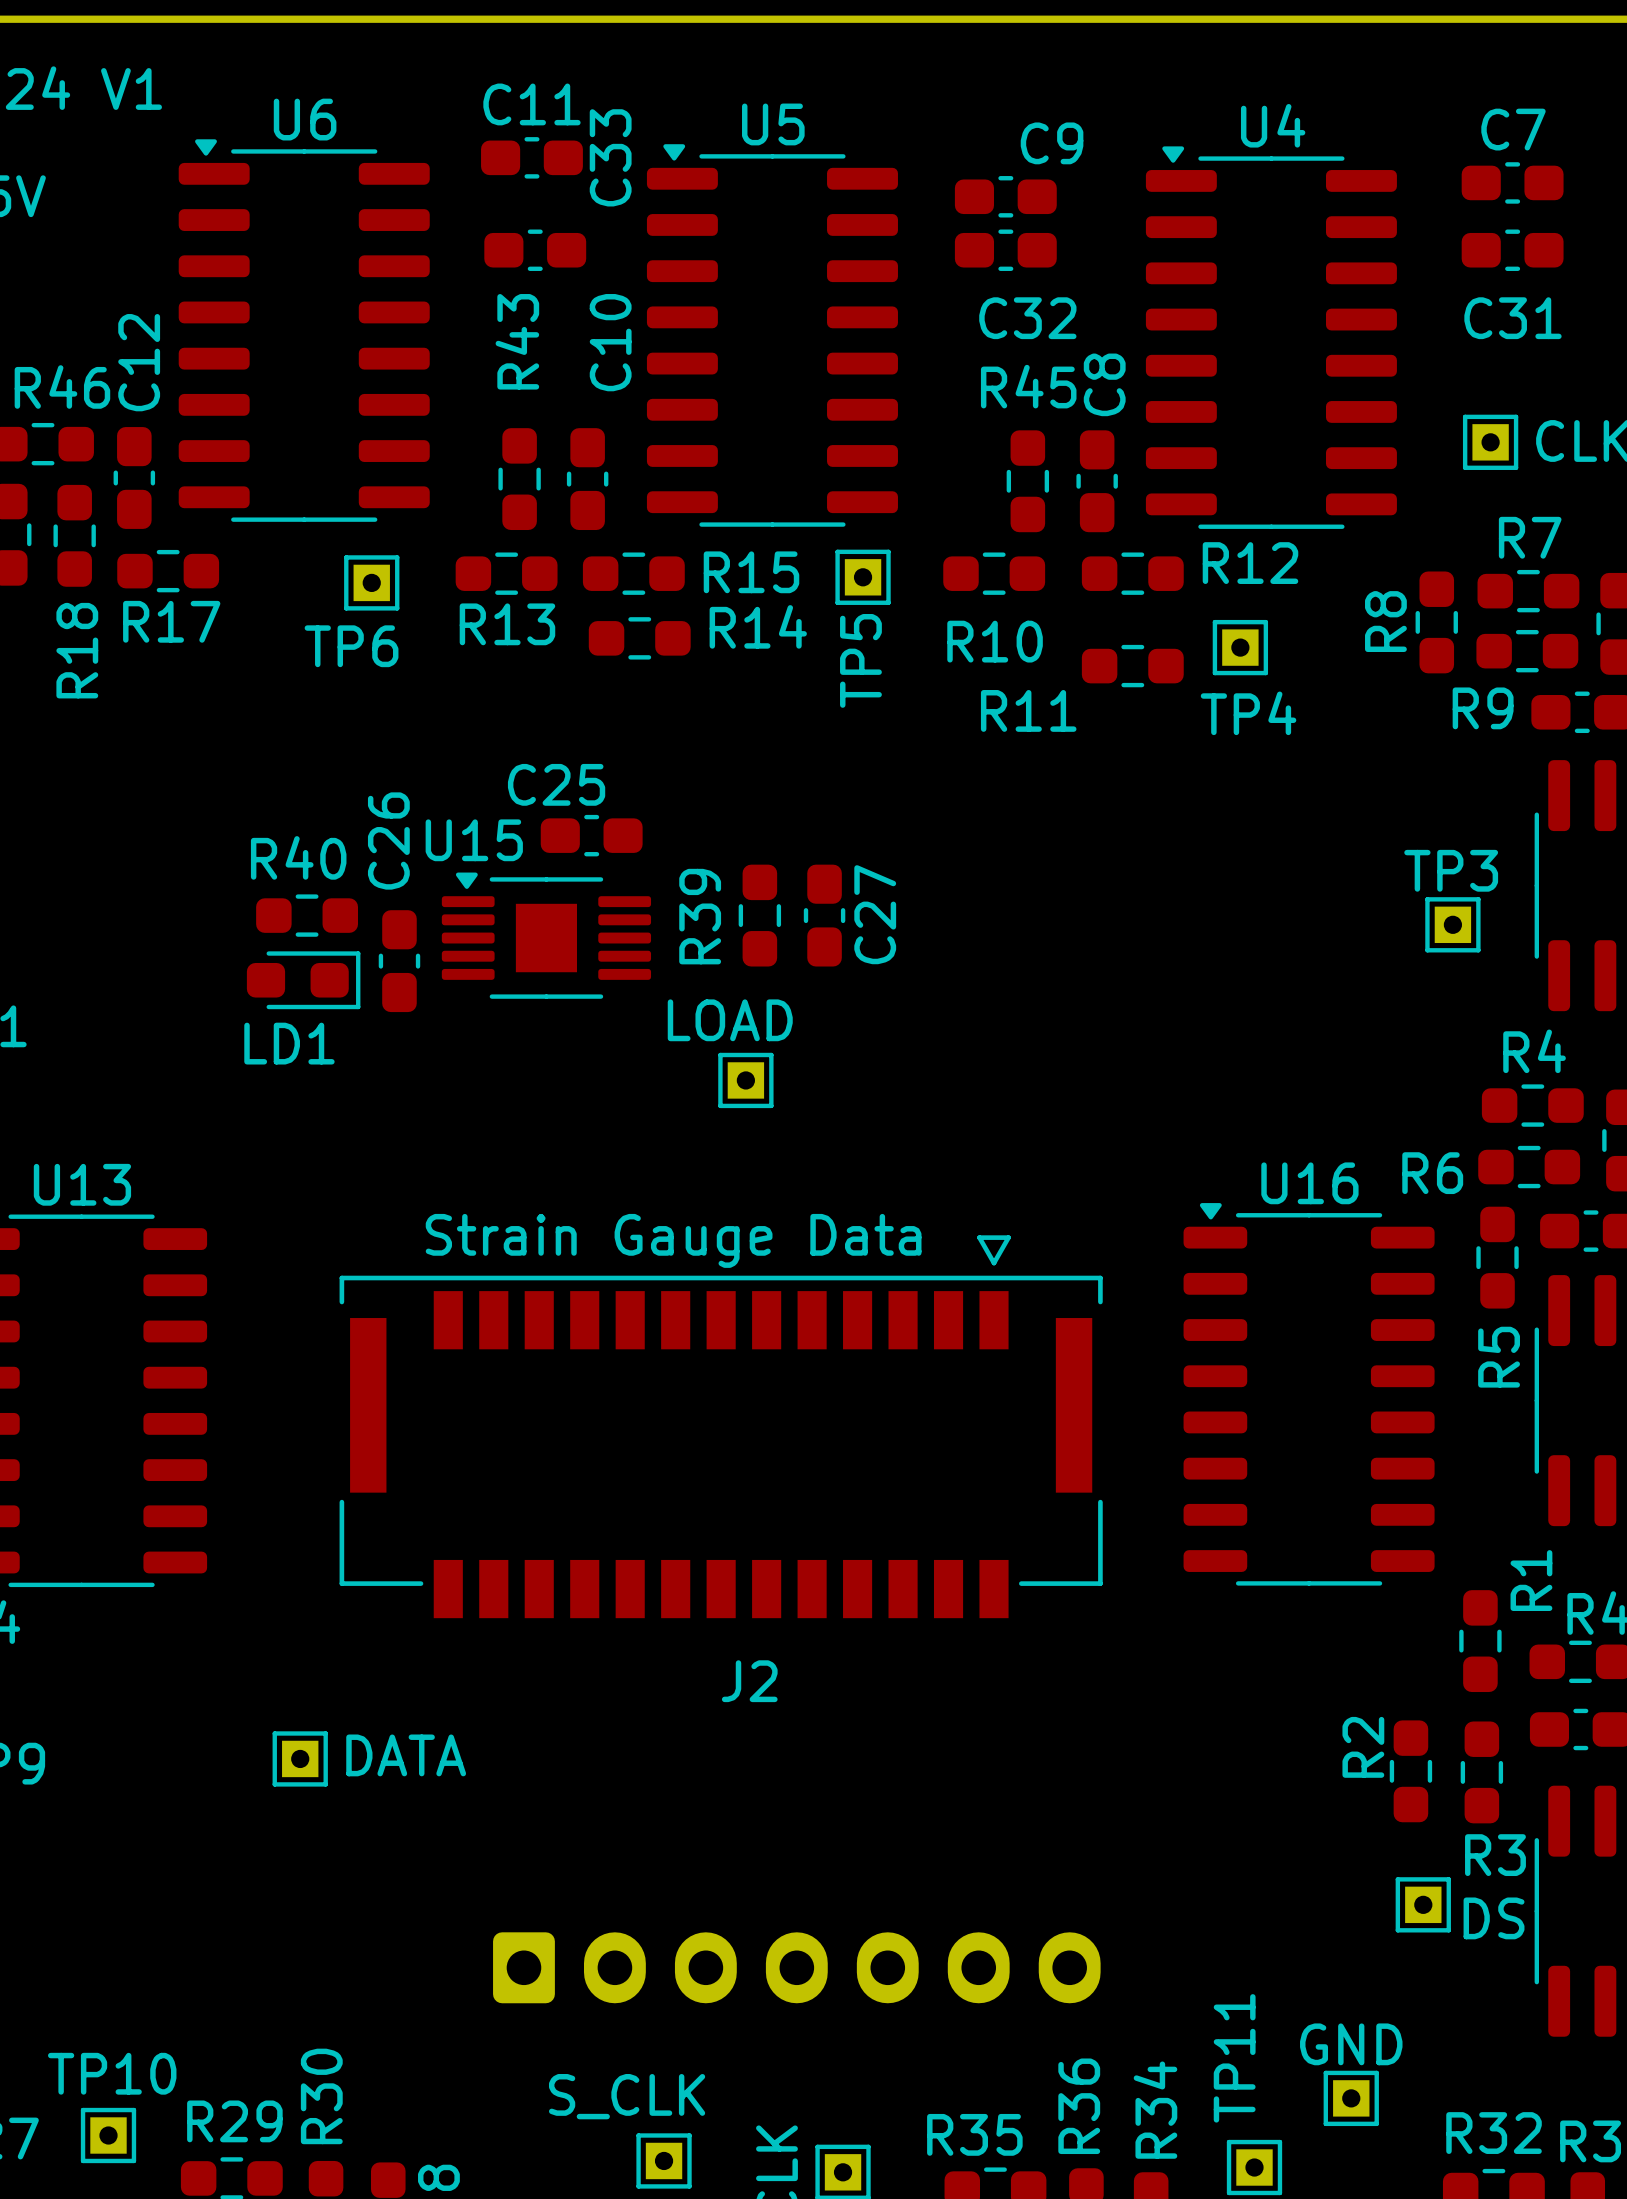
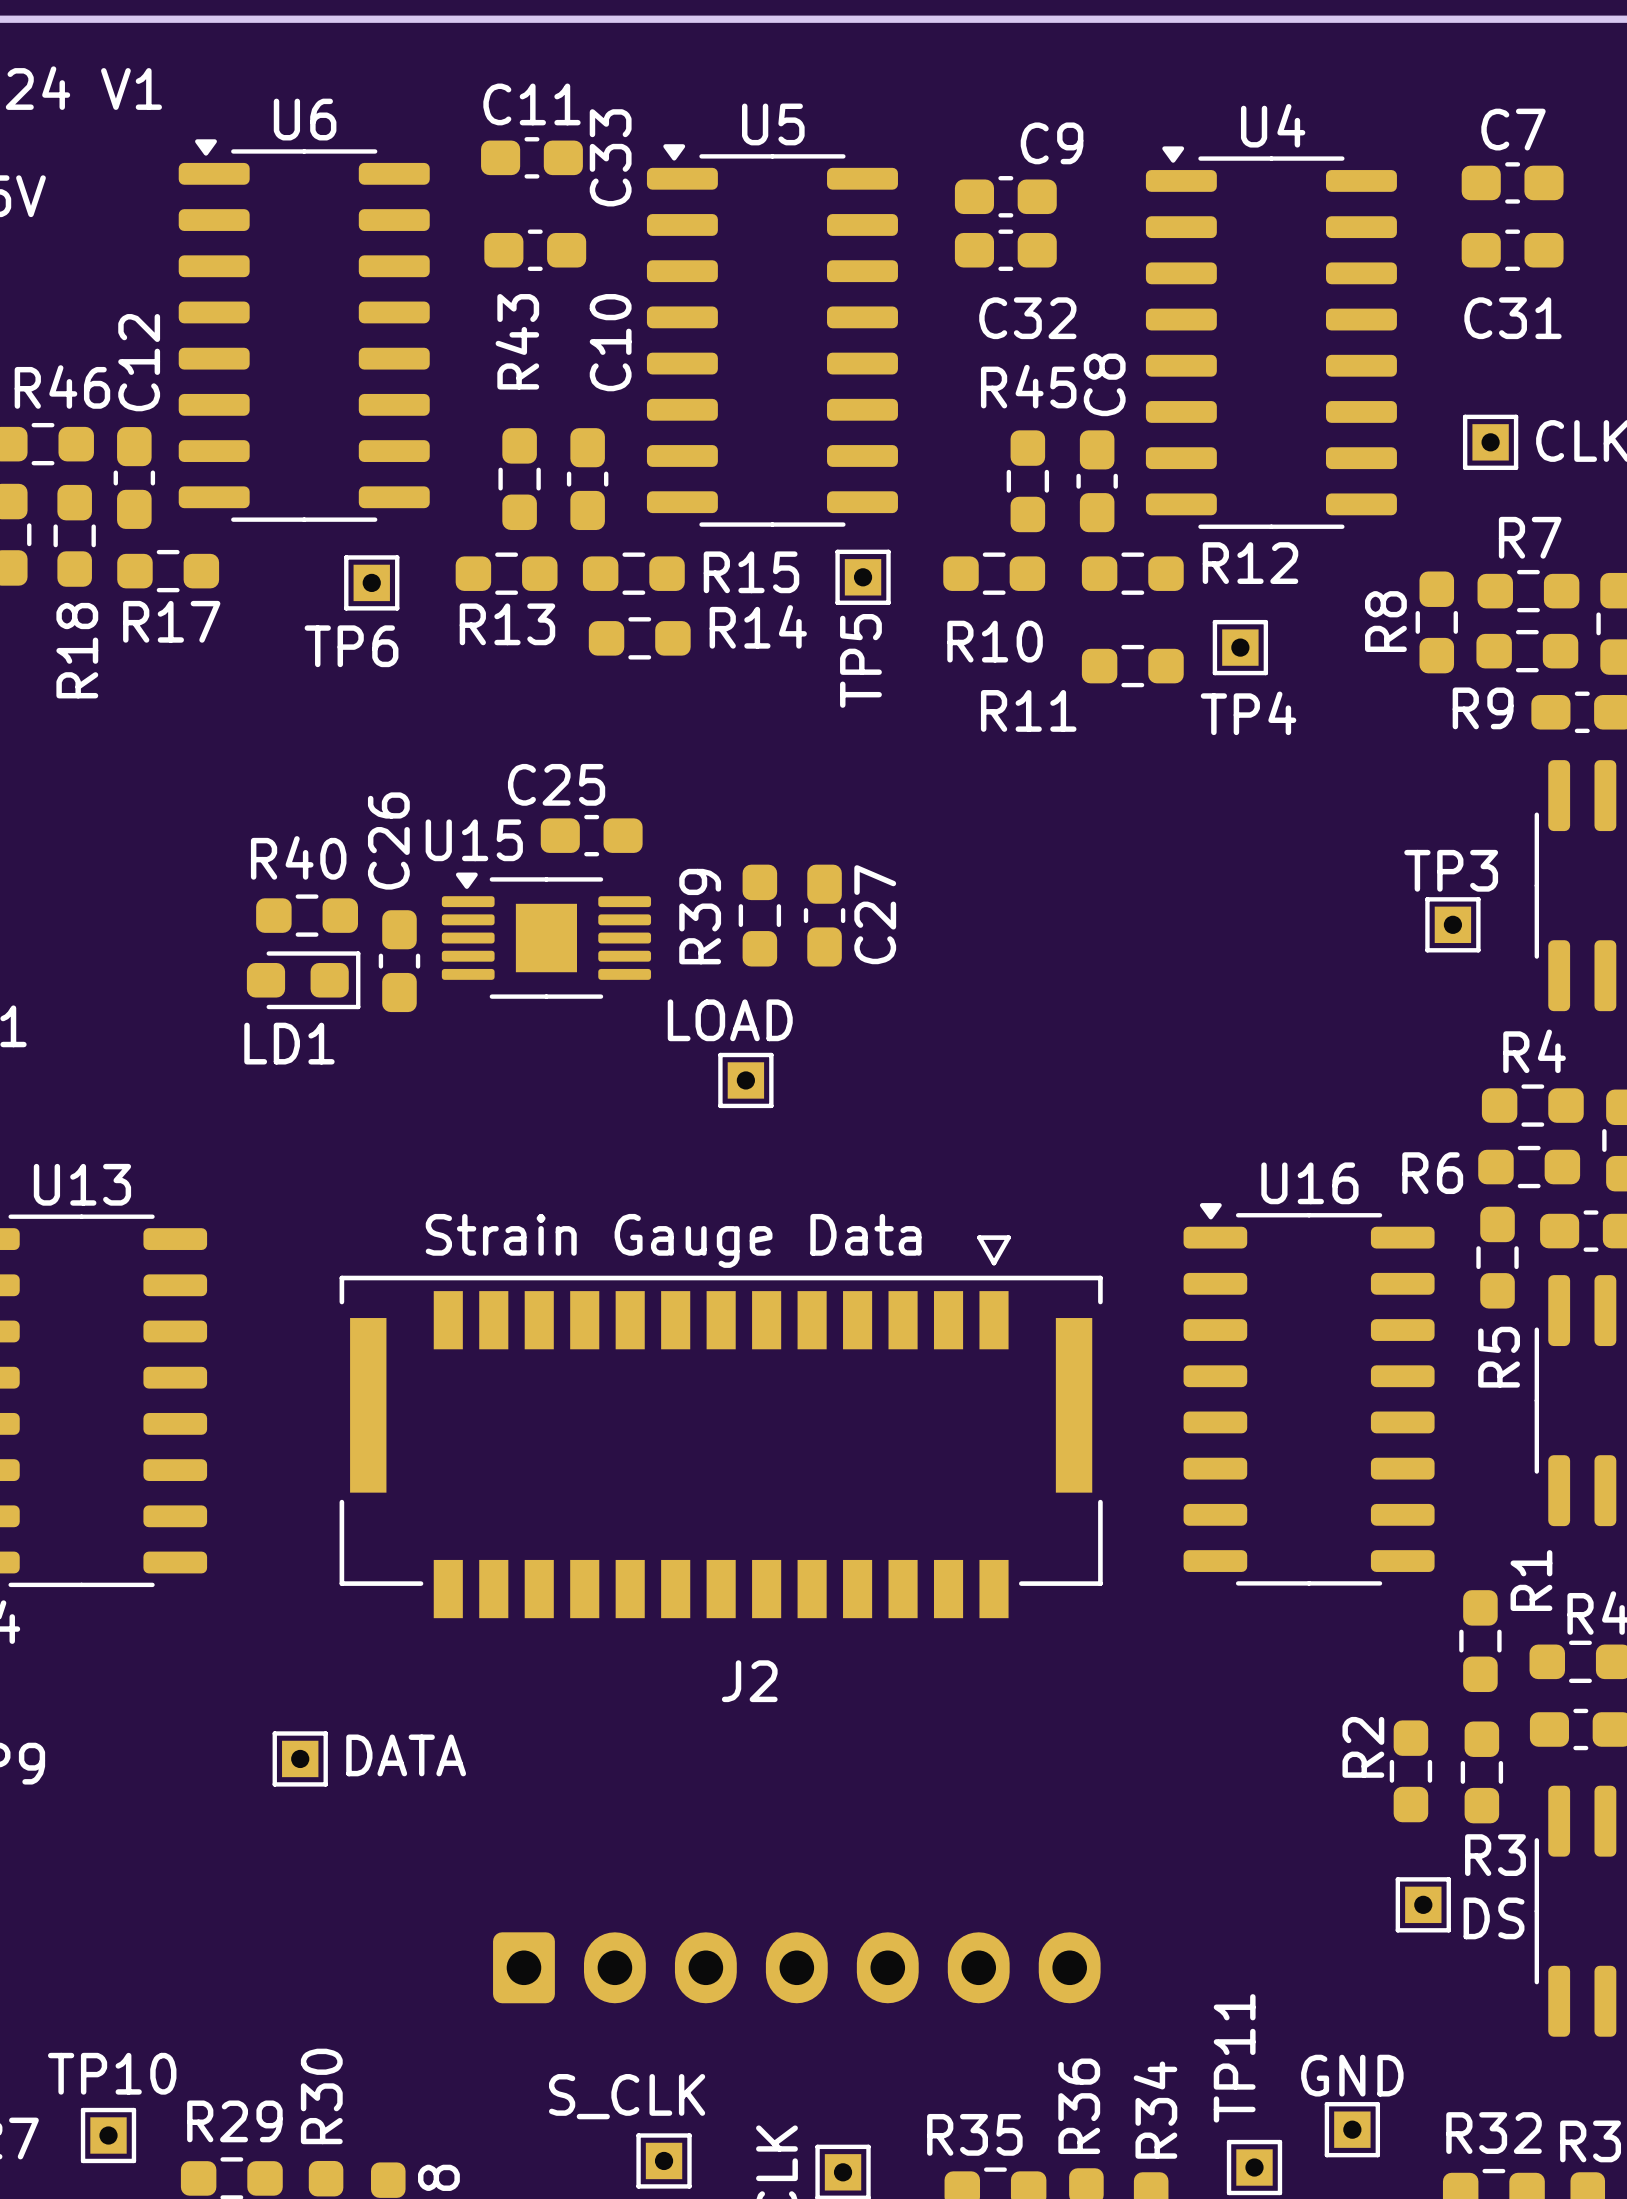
GND position: (1351, 2098) -> (1352, 2129)

